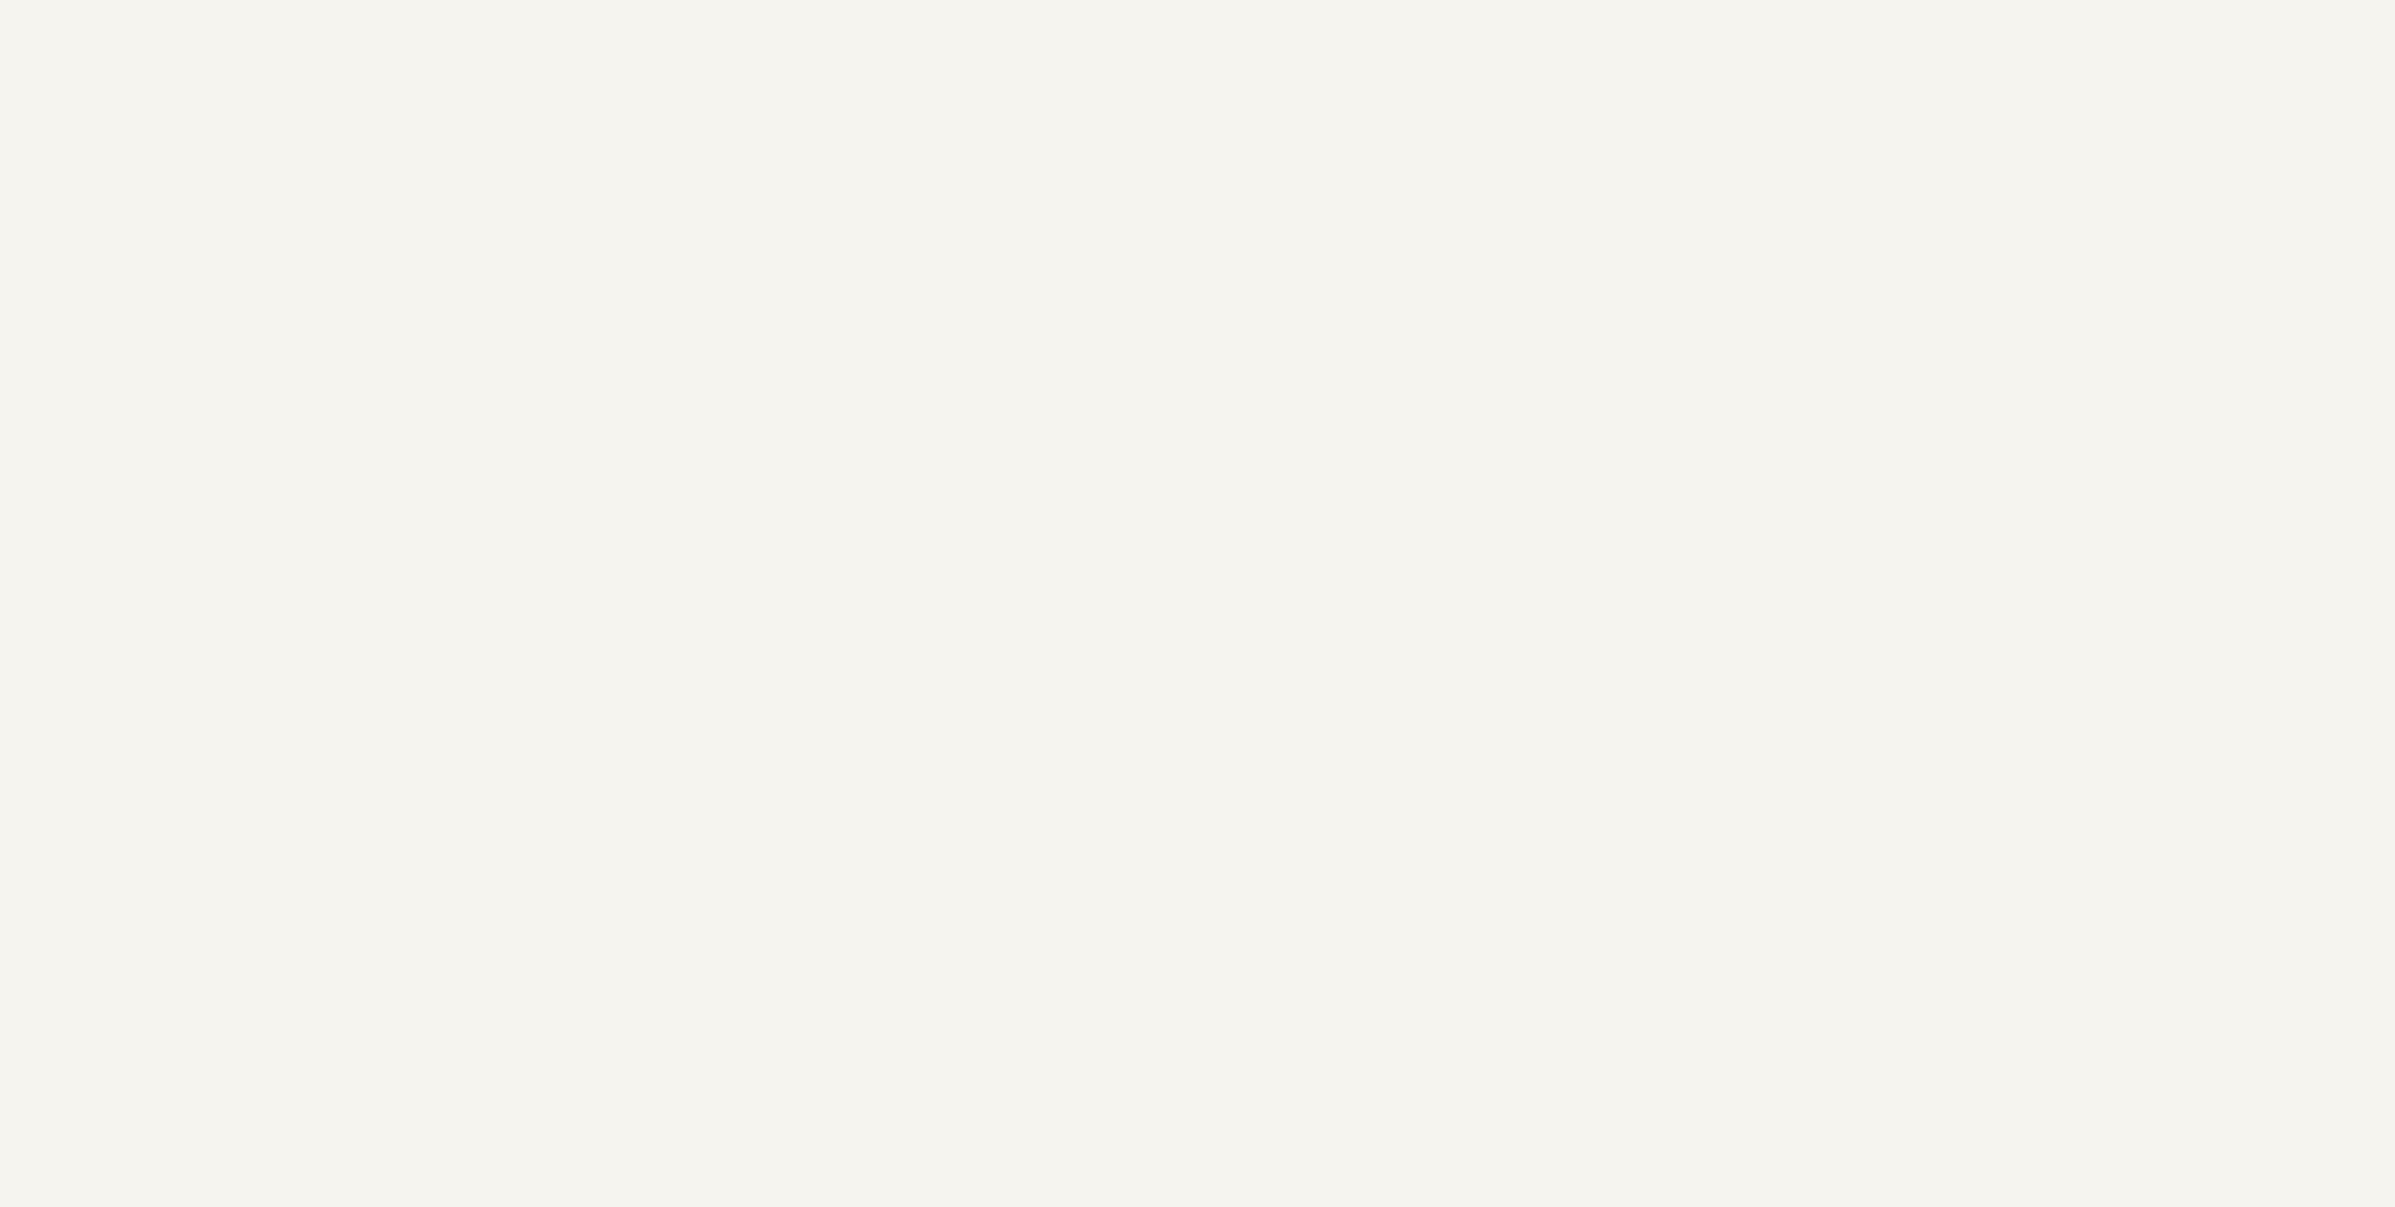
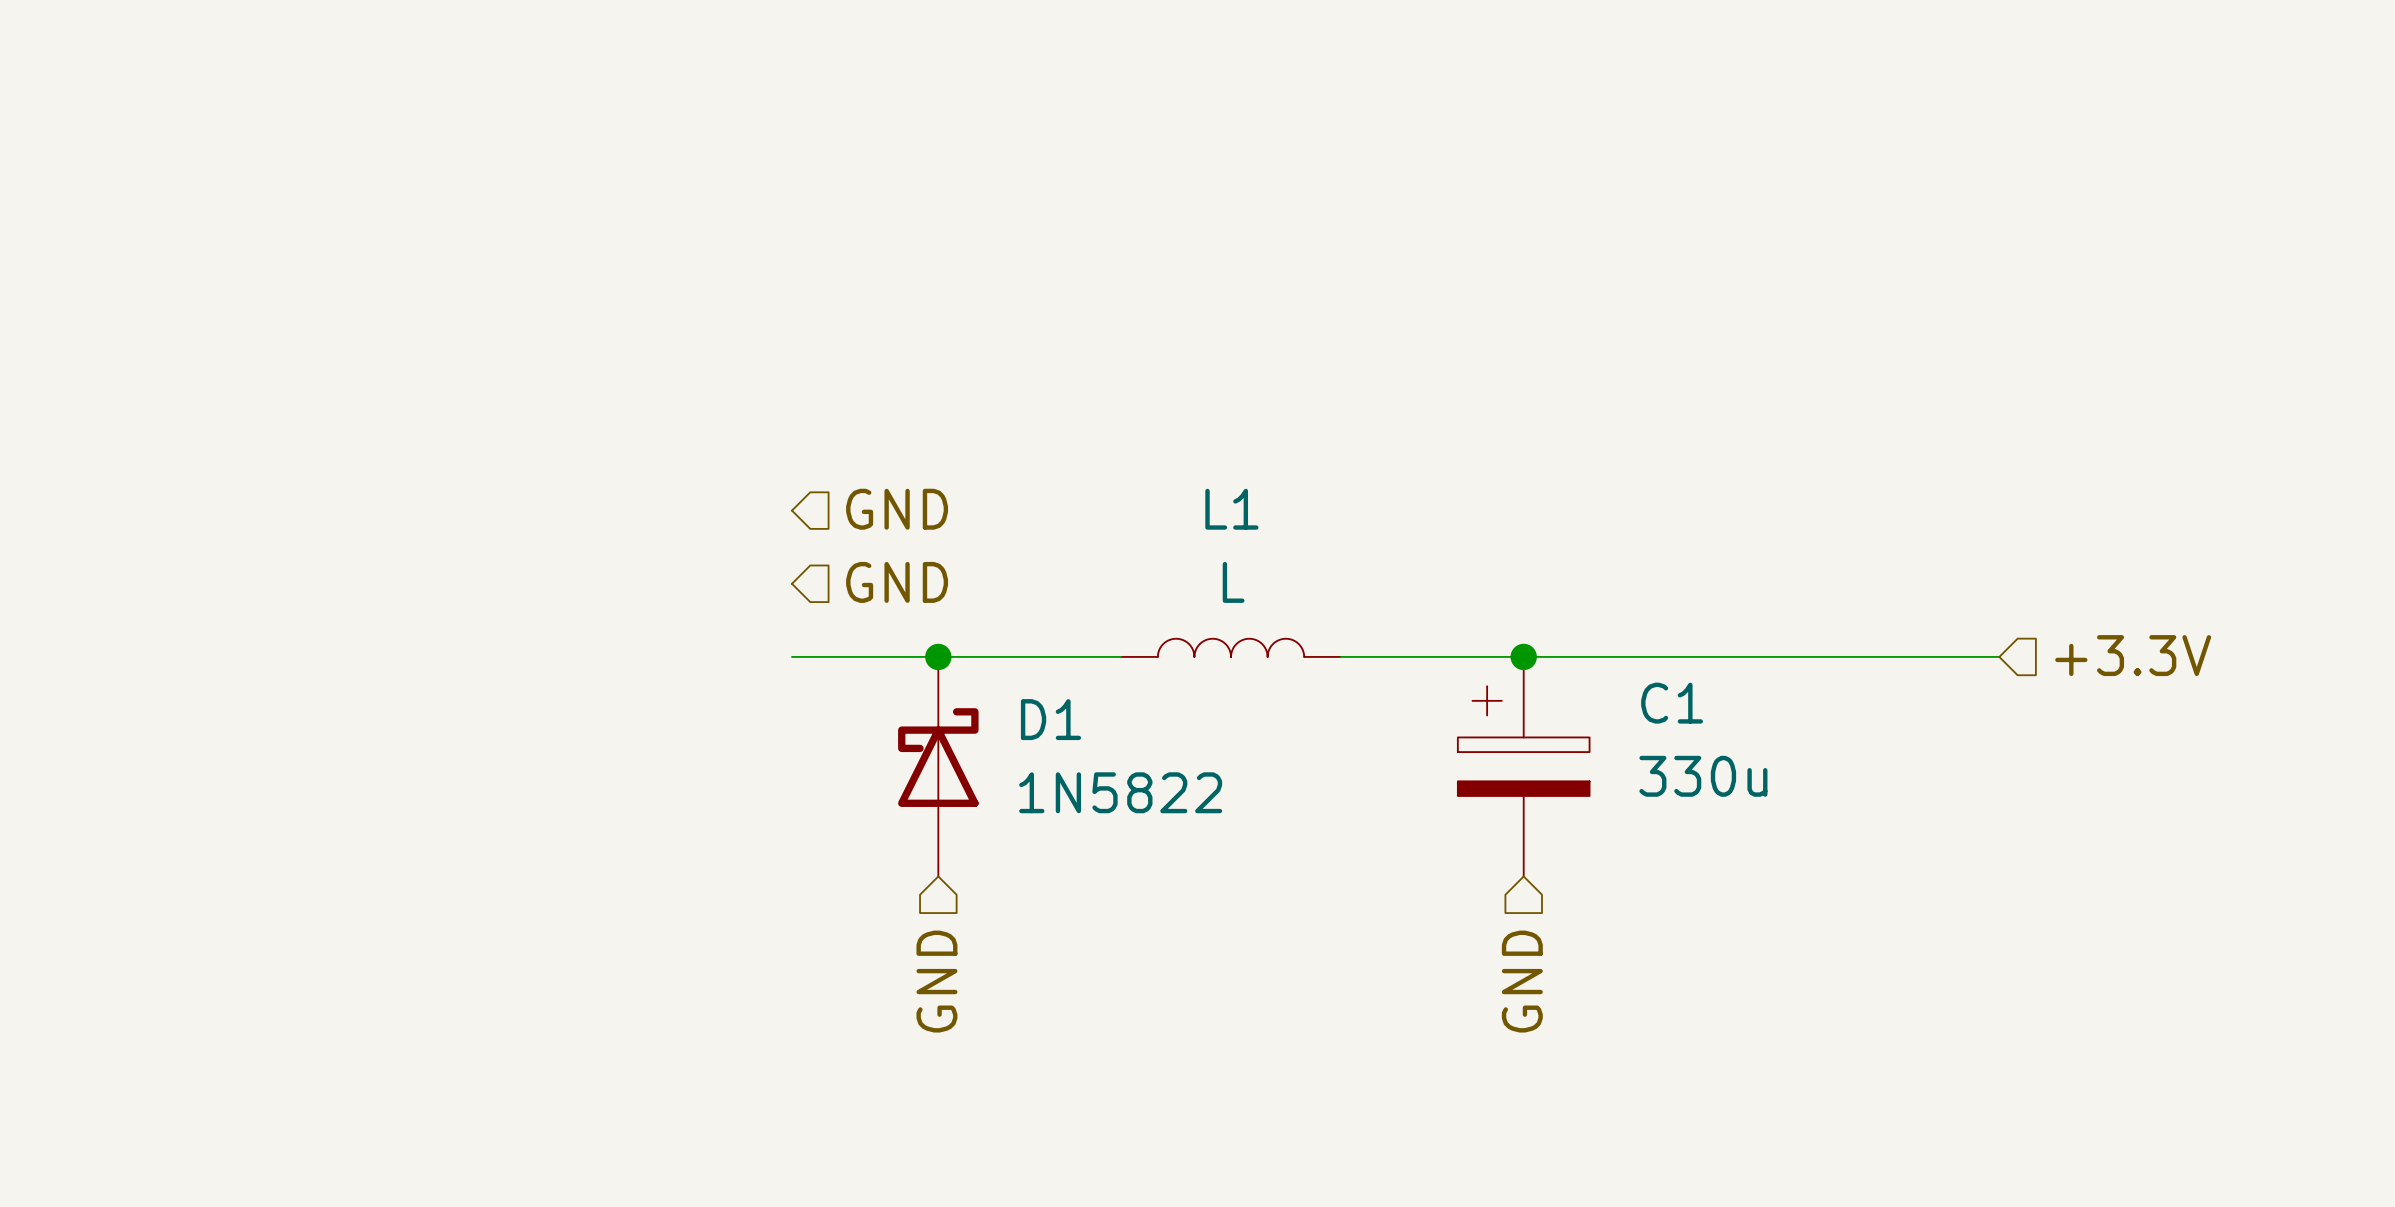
hierarchical label: none -> GND (897, 509)
hierarchical label: none -> GND (897, 582)
L1: none -> L (1231, 647)
hierarchical label: none -> +3.3V (2133, 655)
wire: none -> (791, 656) (1121, 656)
junction: none -> (938, 656)
wire: none -> (1340, 656) (1999, 656)
junction: none -> (1523, 656)
D1: none -> 1N5822 (938, 766)
C1: none -> 330u (1523, 766)
hierarchical label: none -> GND (936, 981)
hierarchical label: none -> GND (1522, 981)

